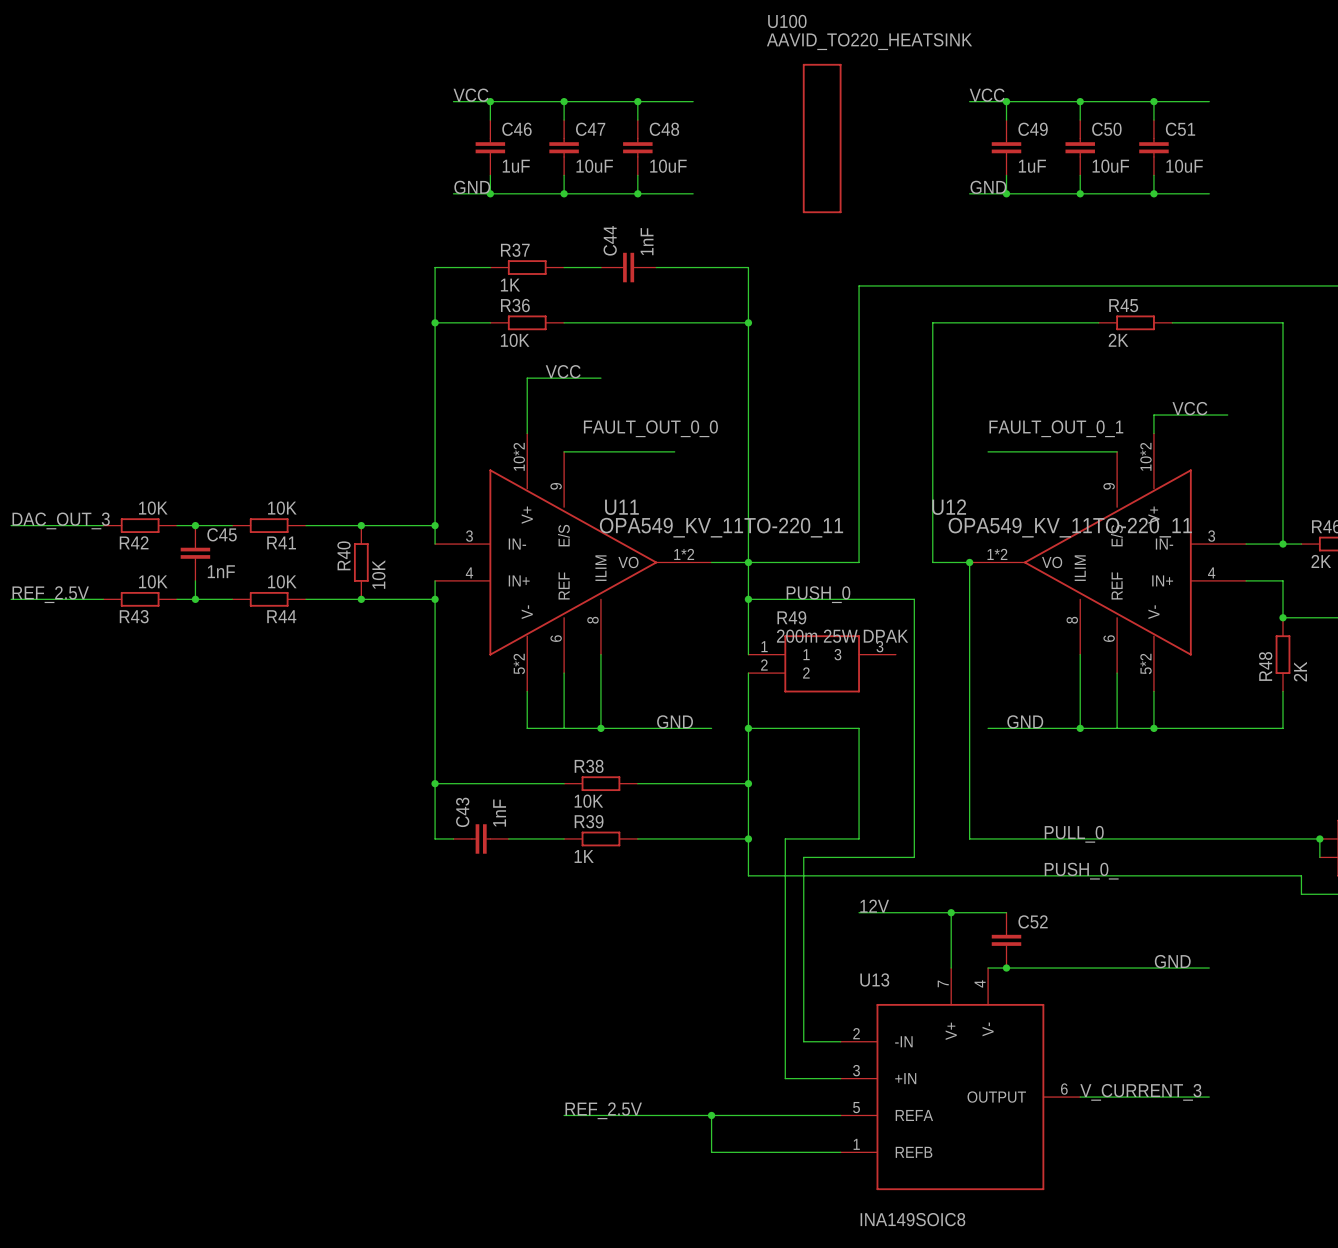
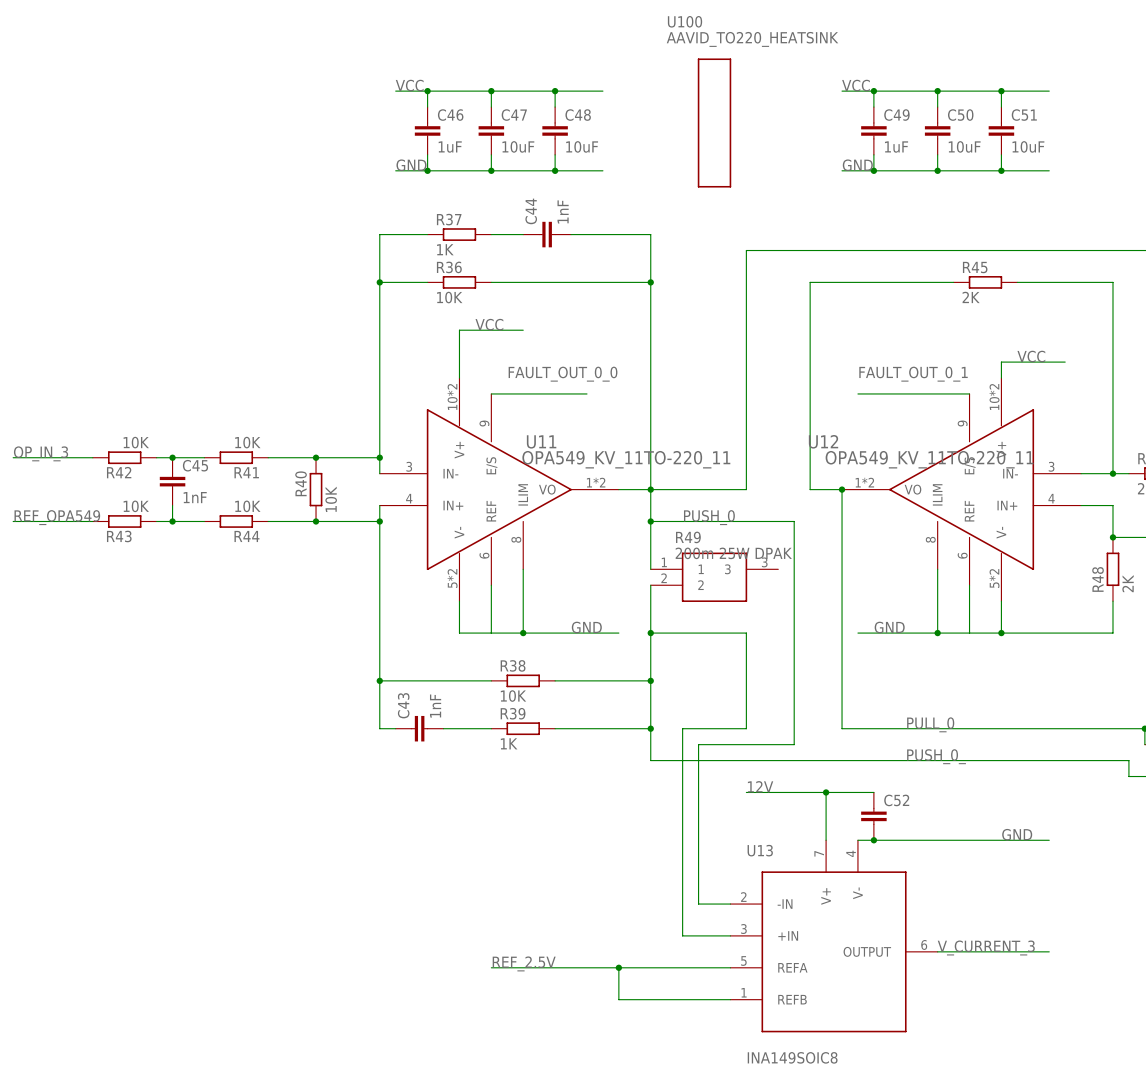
label: DAC_OUT_3 (61, 520) -> OP_IN_3 (41, 453)
label: REF_2.5V (50, 594) -> REF_OPA549 (57, 517)

